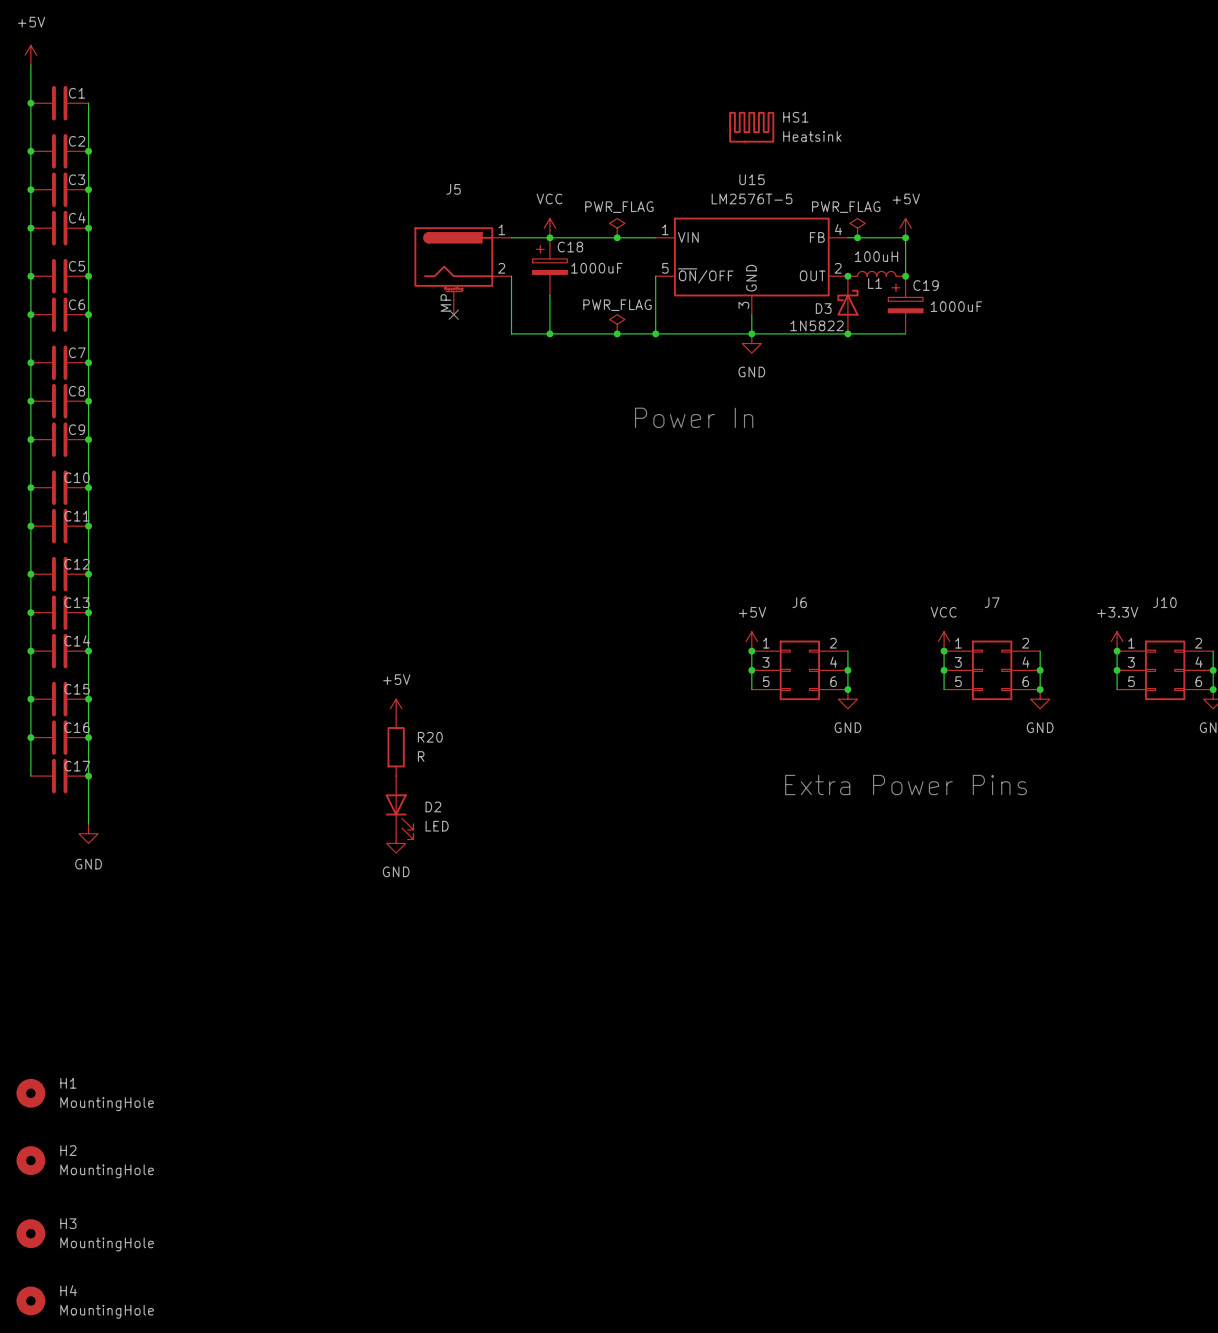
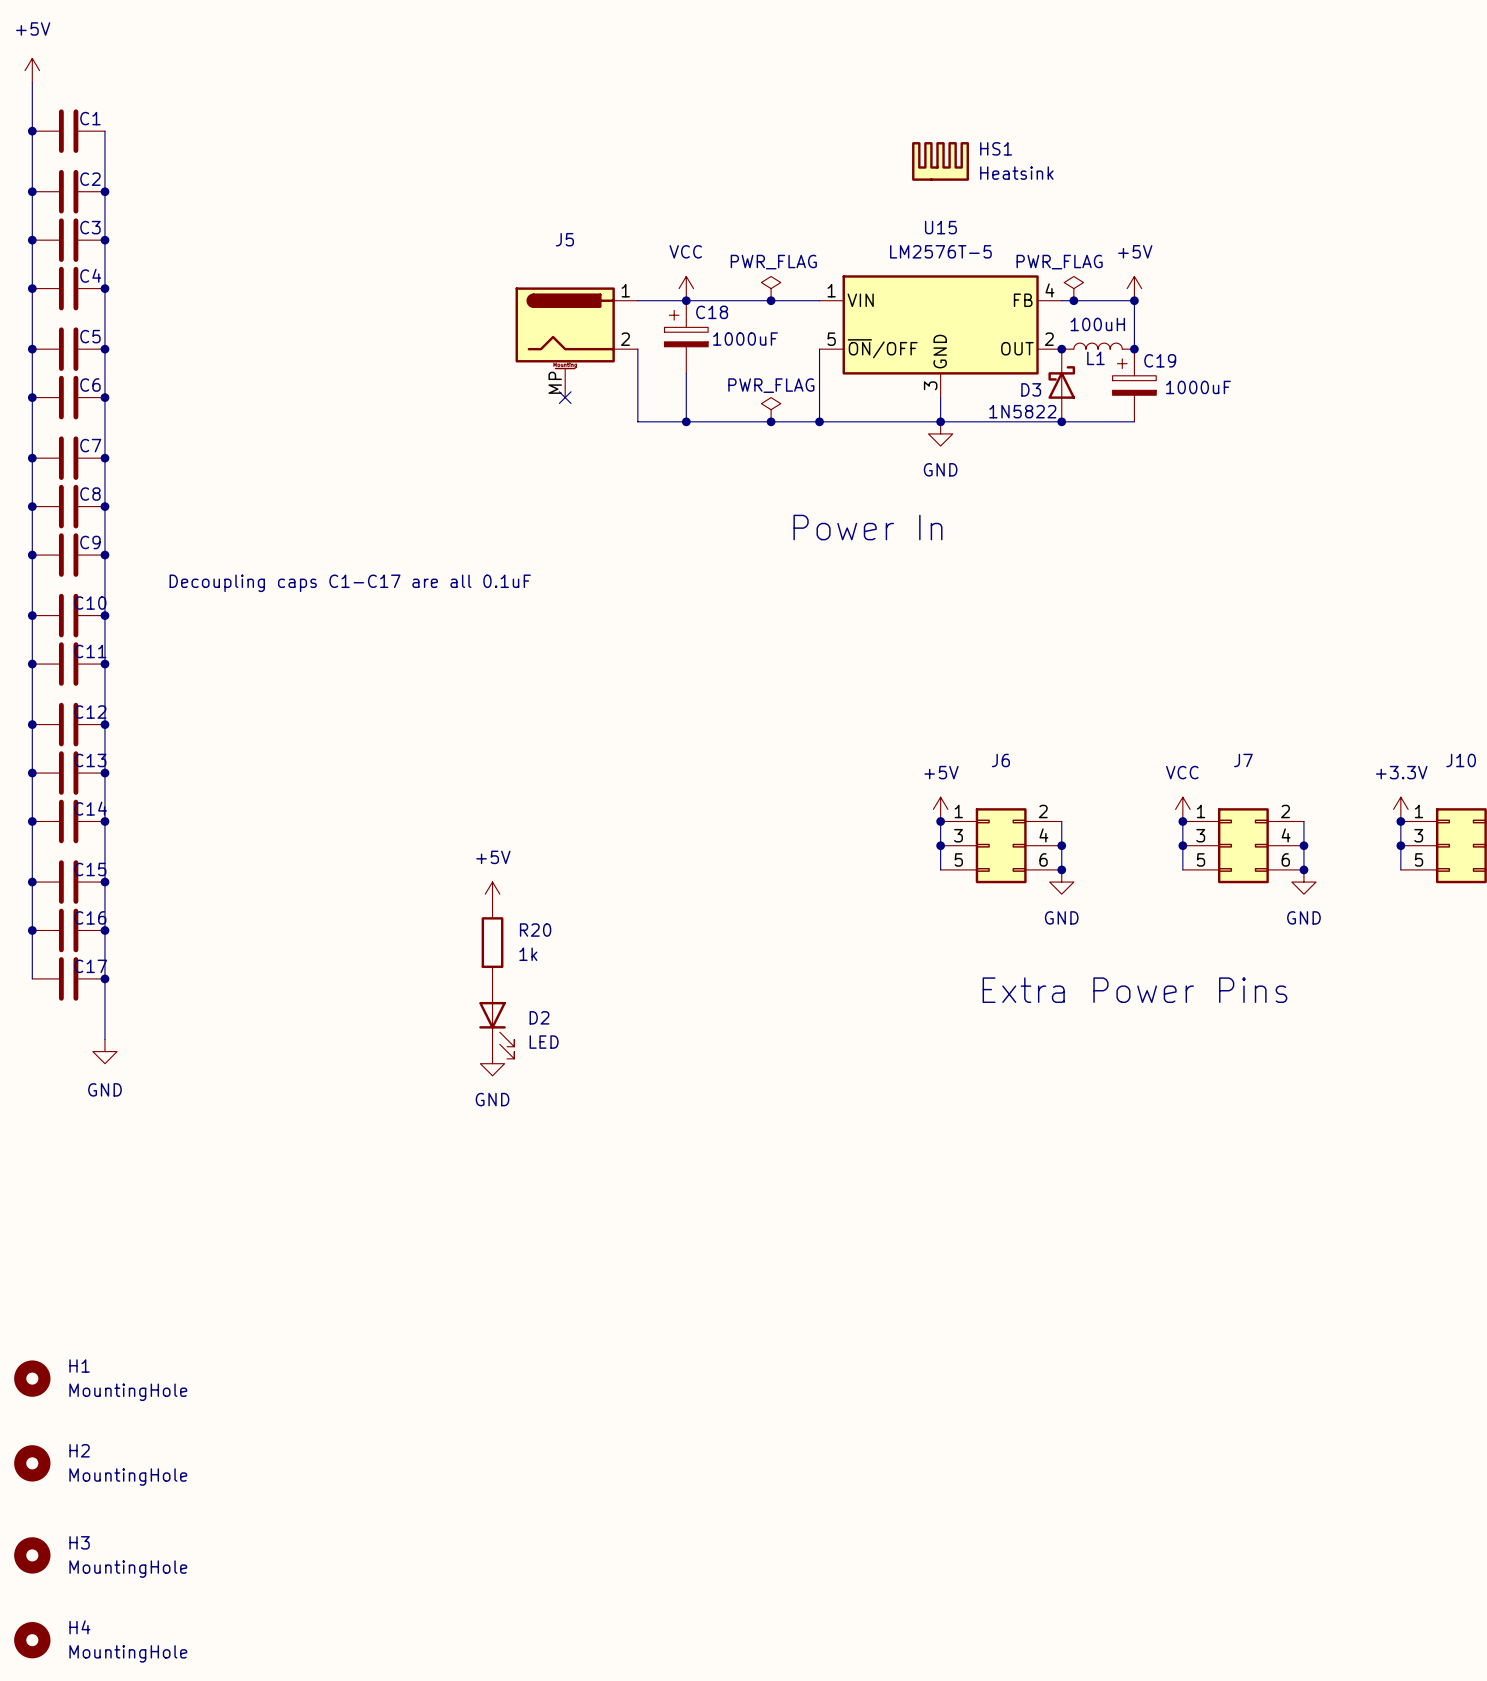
text: none -> Decoupling caps C1-C17 are all 0.1uF (350, 583)
R20 value: R (421, 756) -> 1k (528, 954)

